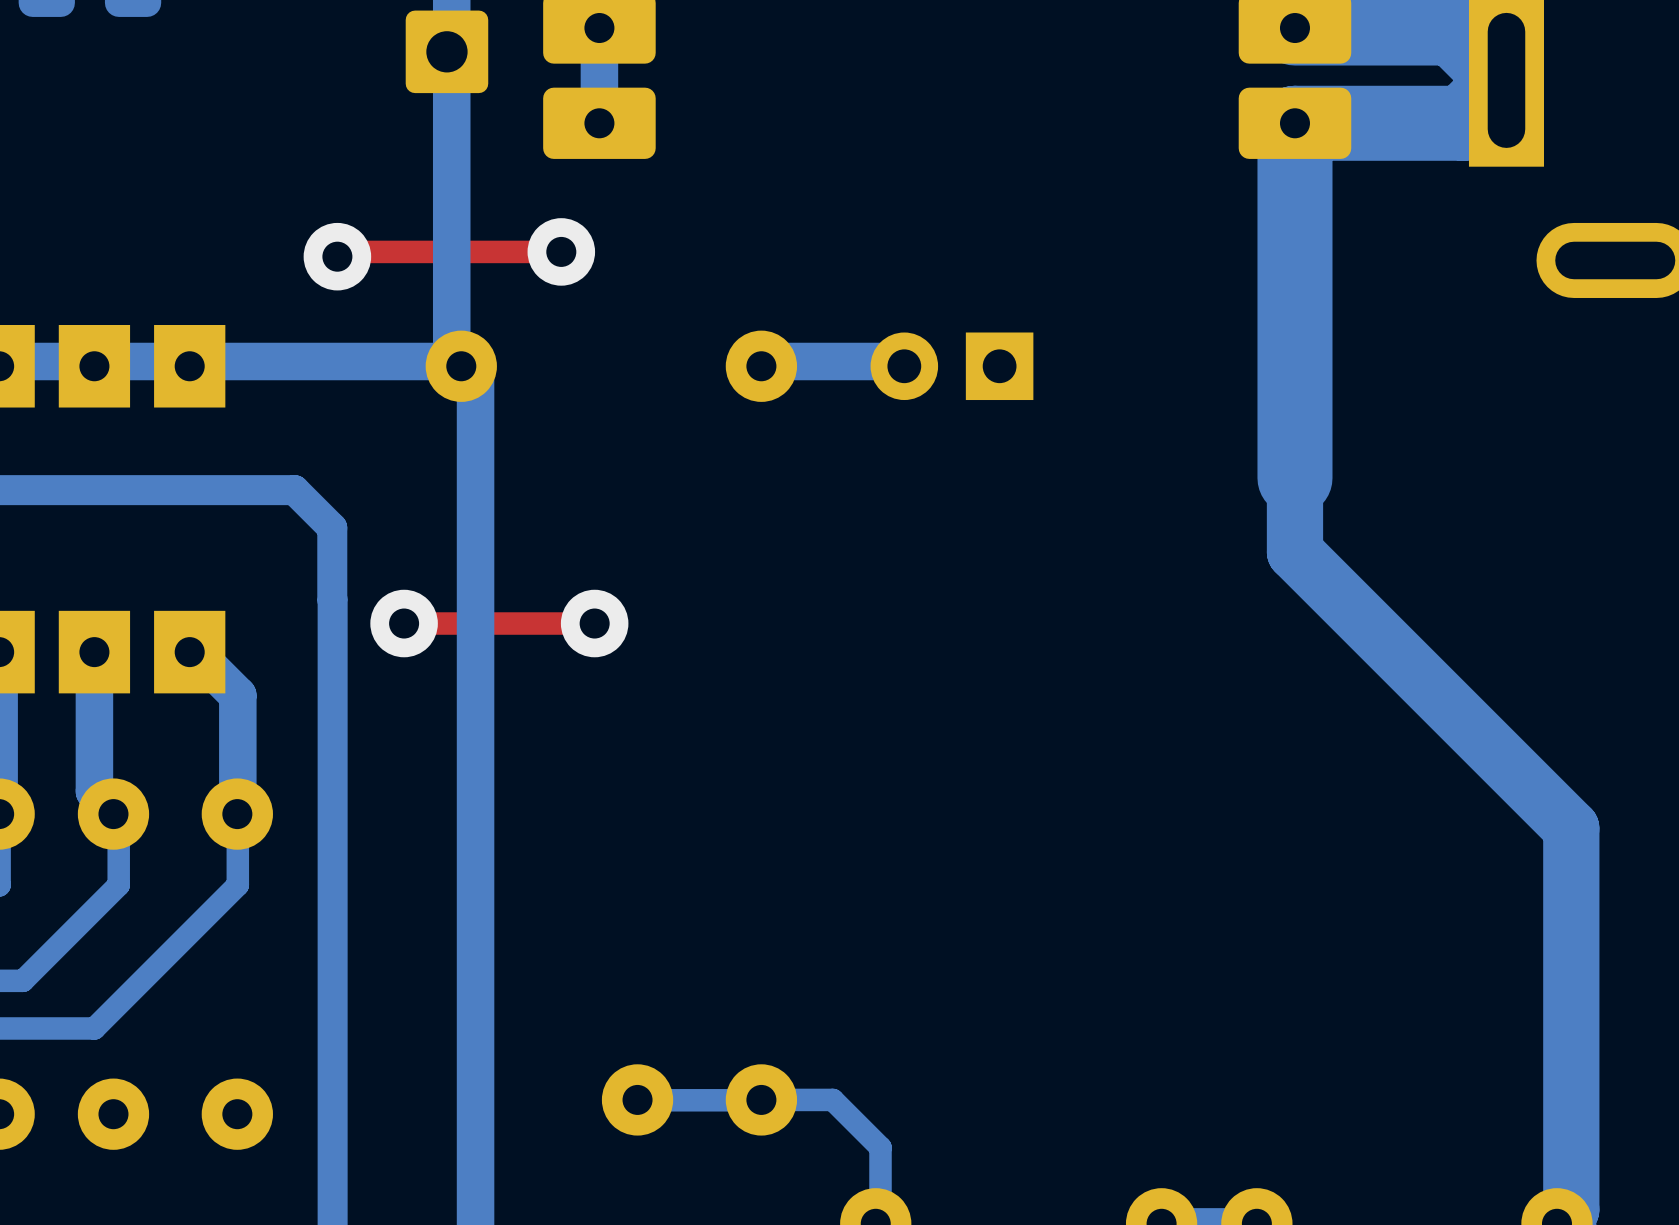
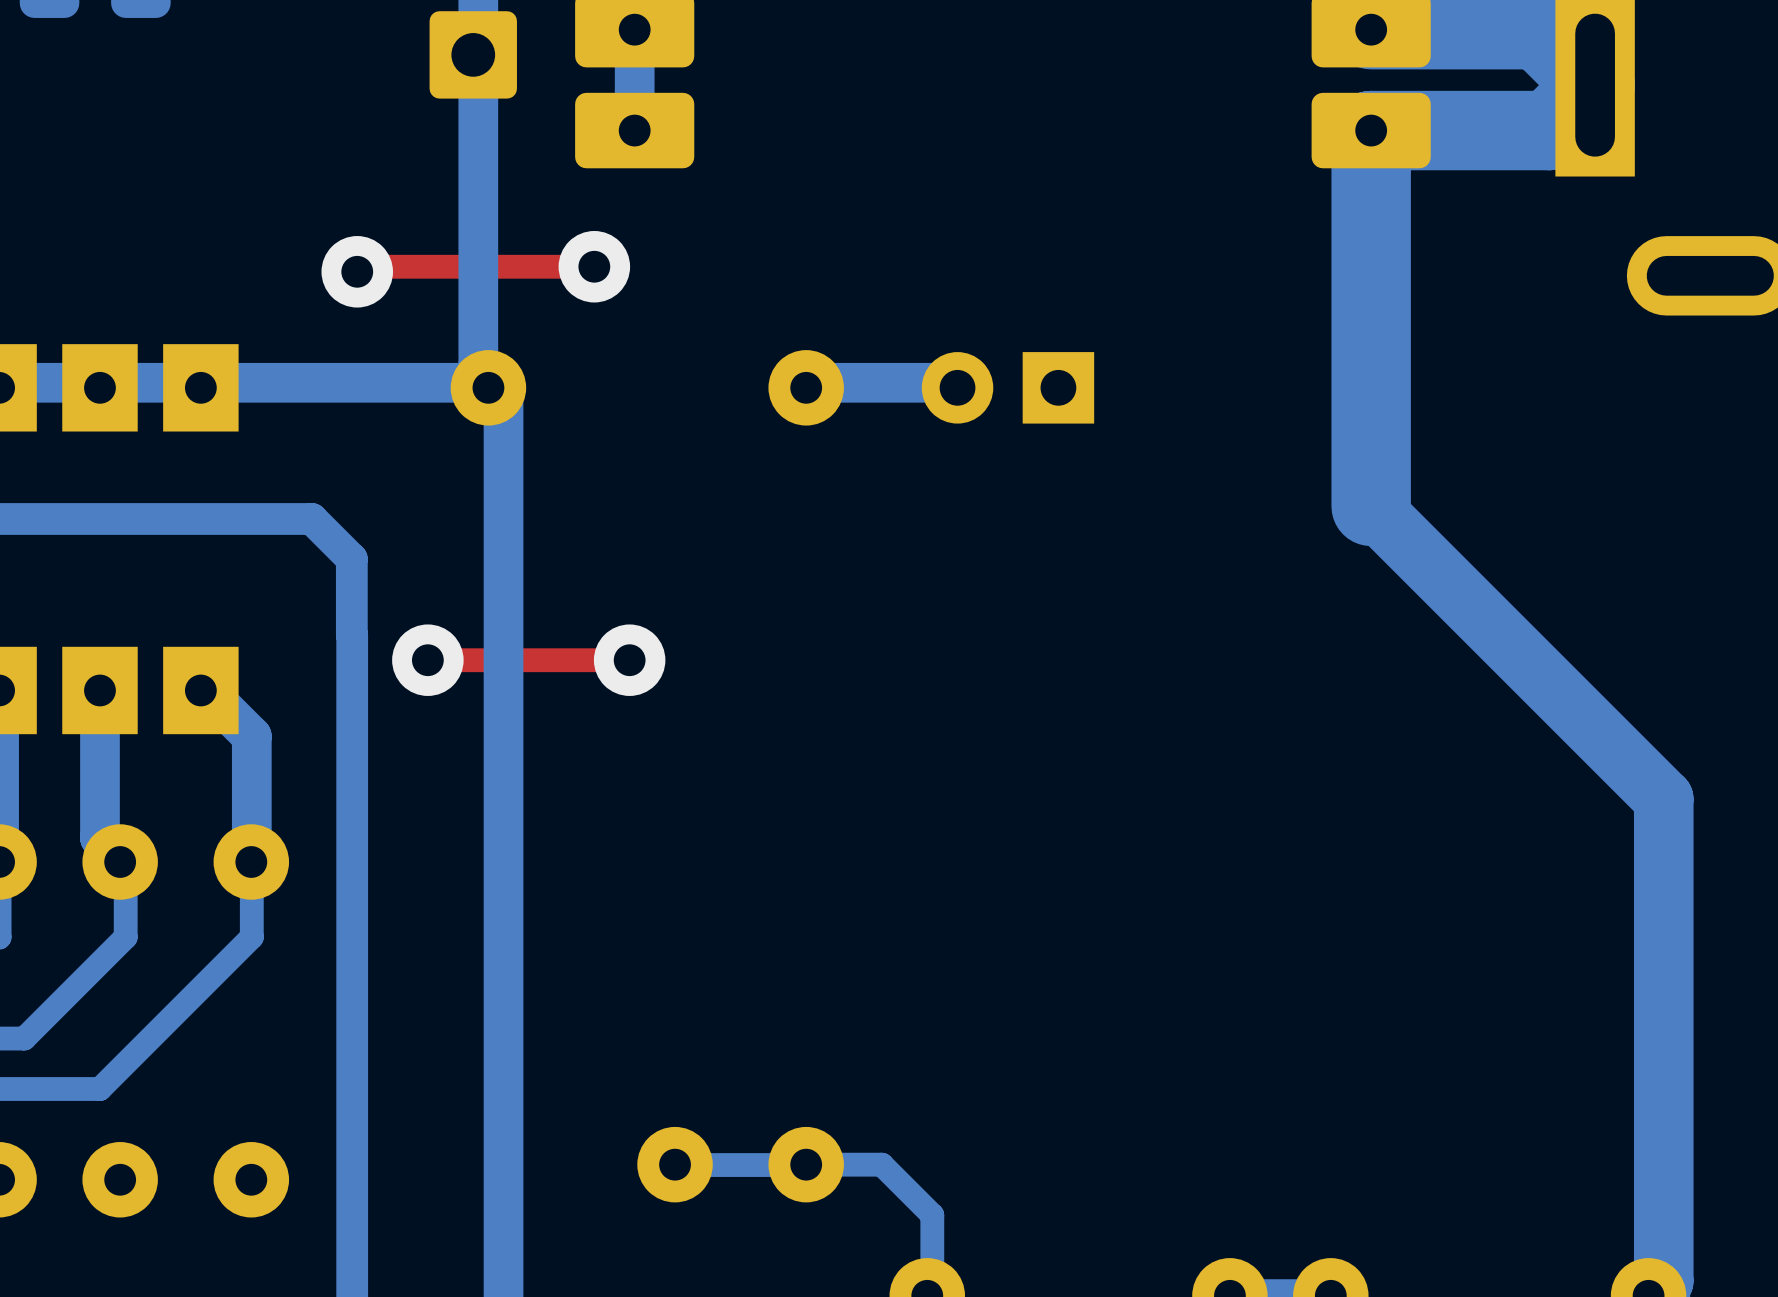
bottom track: (1294, 478) (1294, 552) (1571, 828) -> (1371, 506) (1663, 798) (1663, 877)

